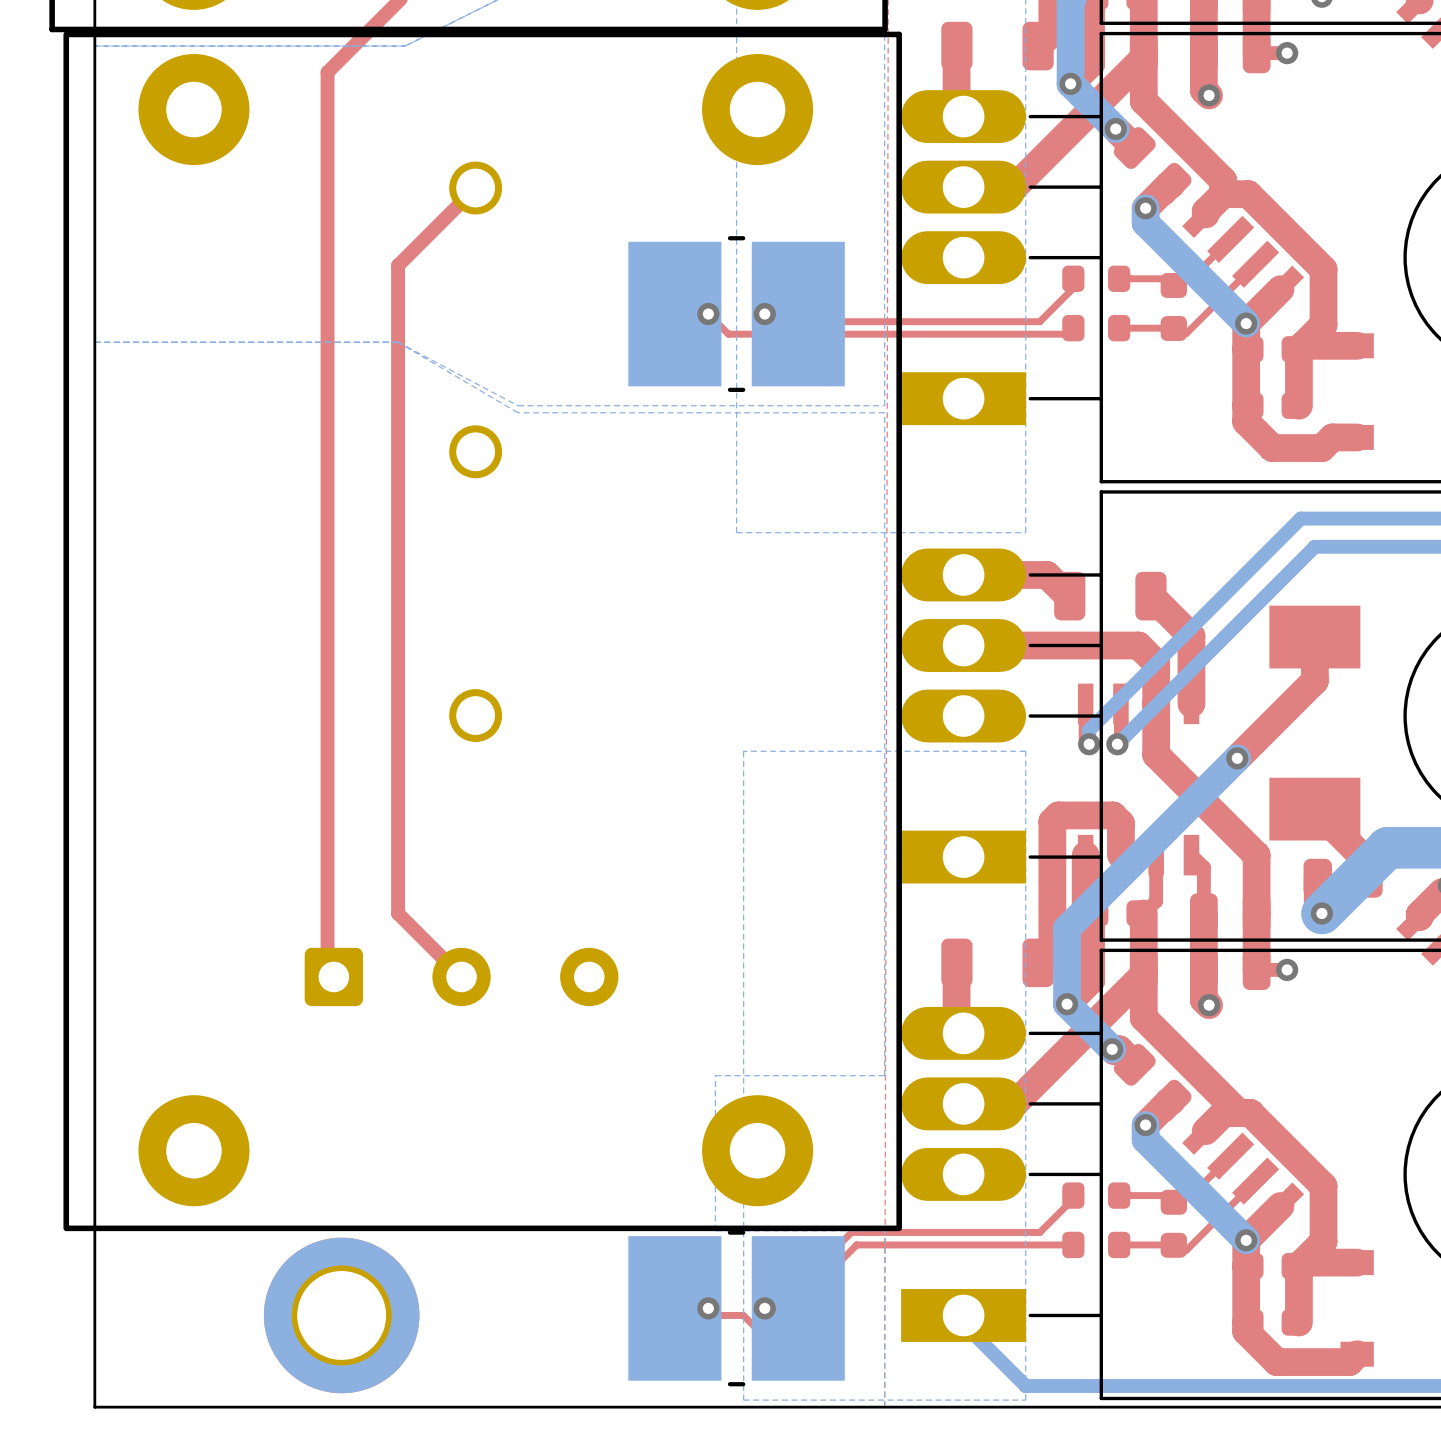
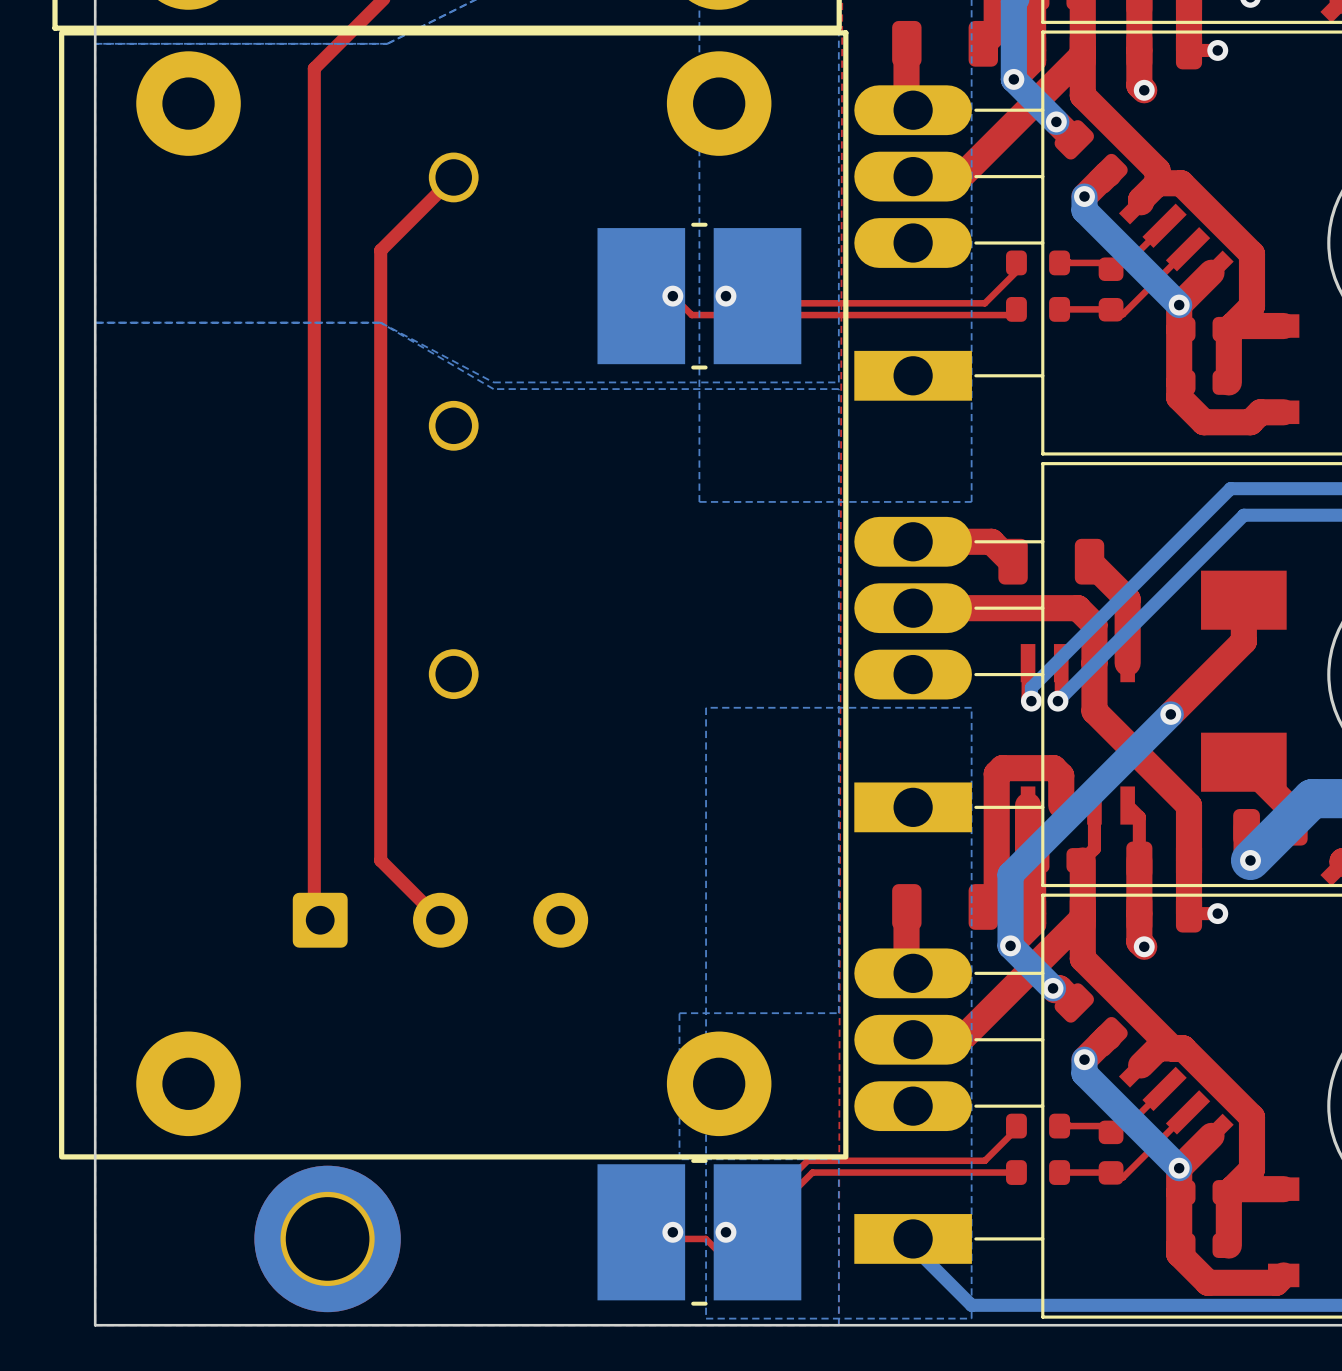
part footprint: [63, 31, 902, 1232] -> [59, 30, 849, 1160]

